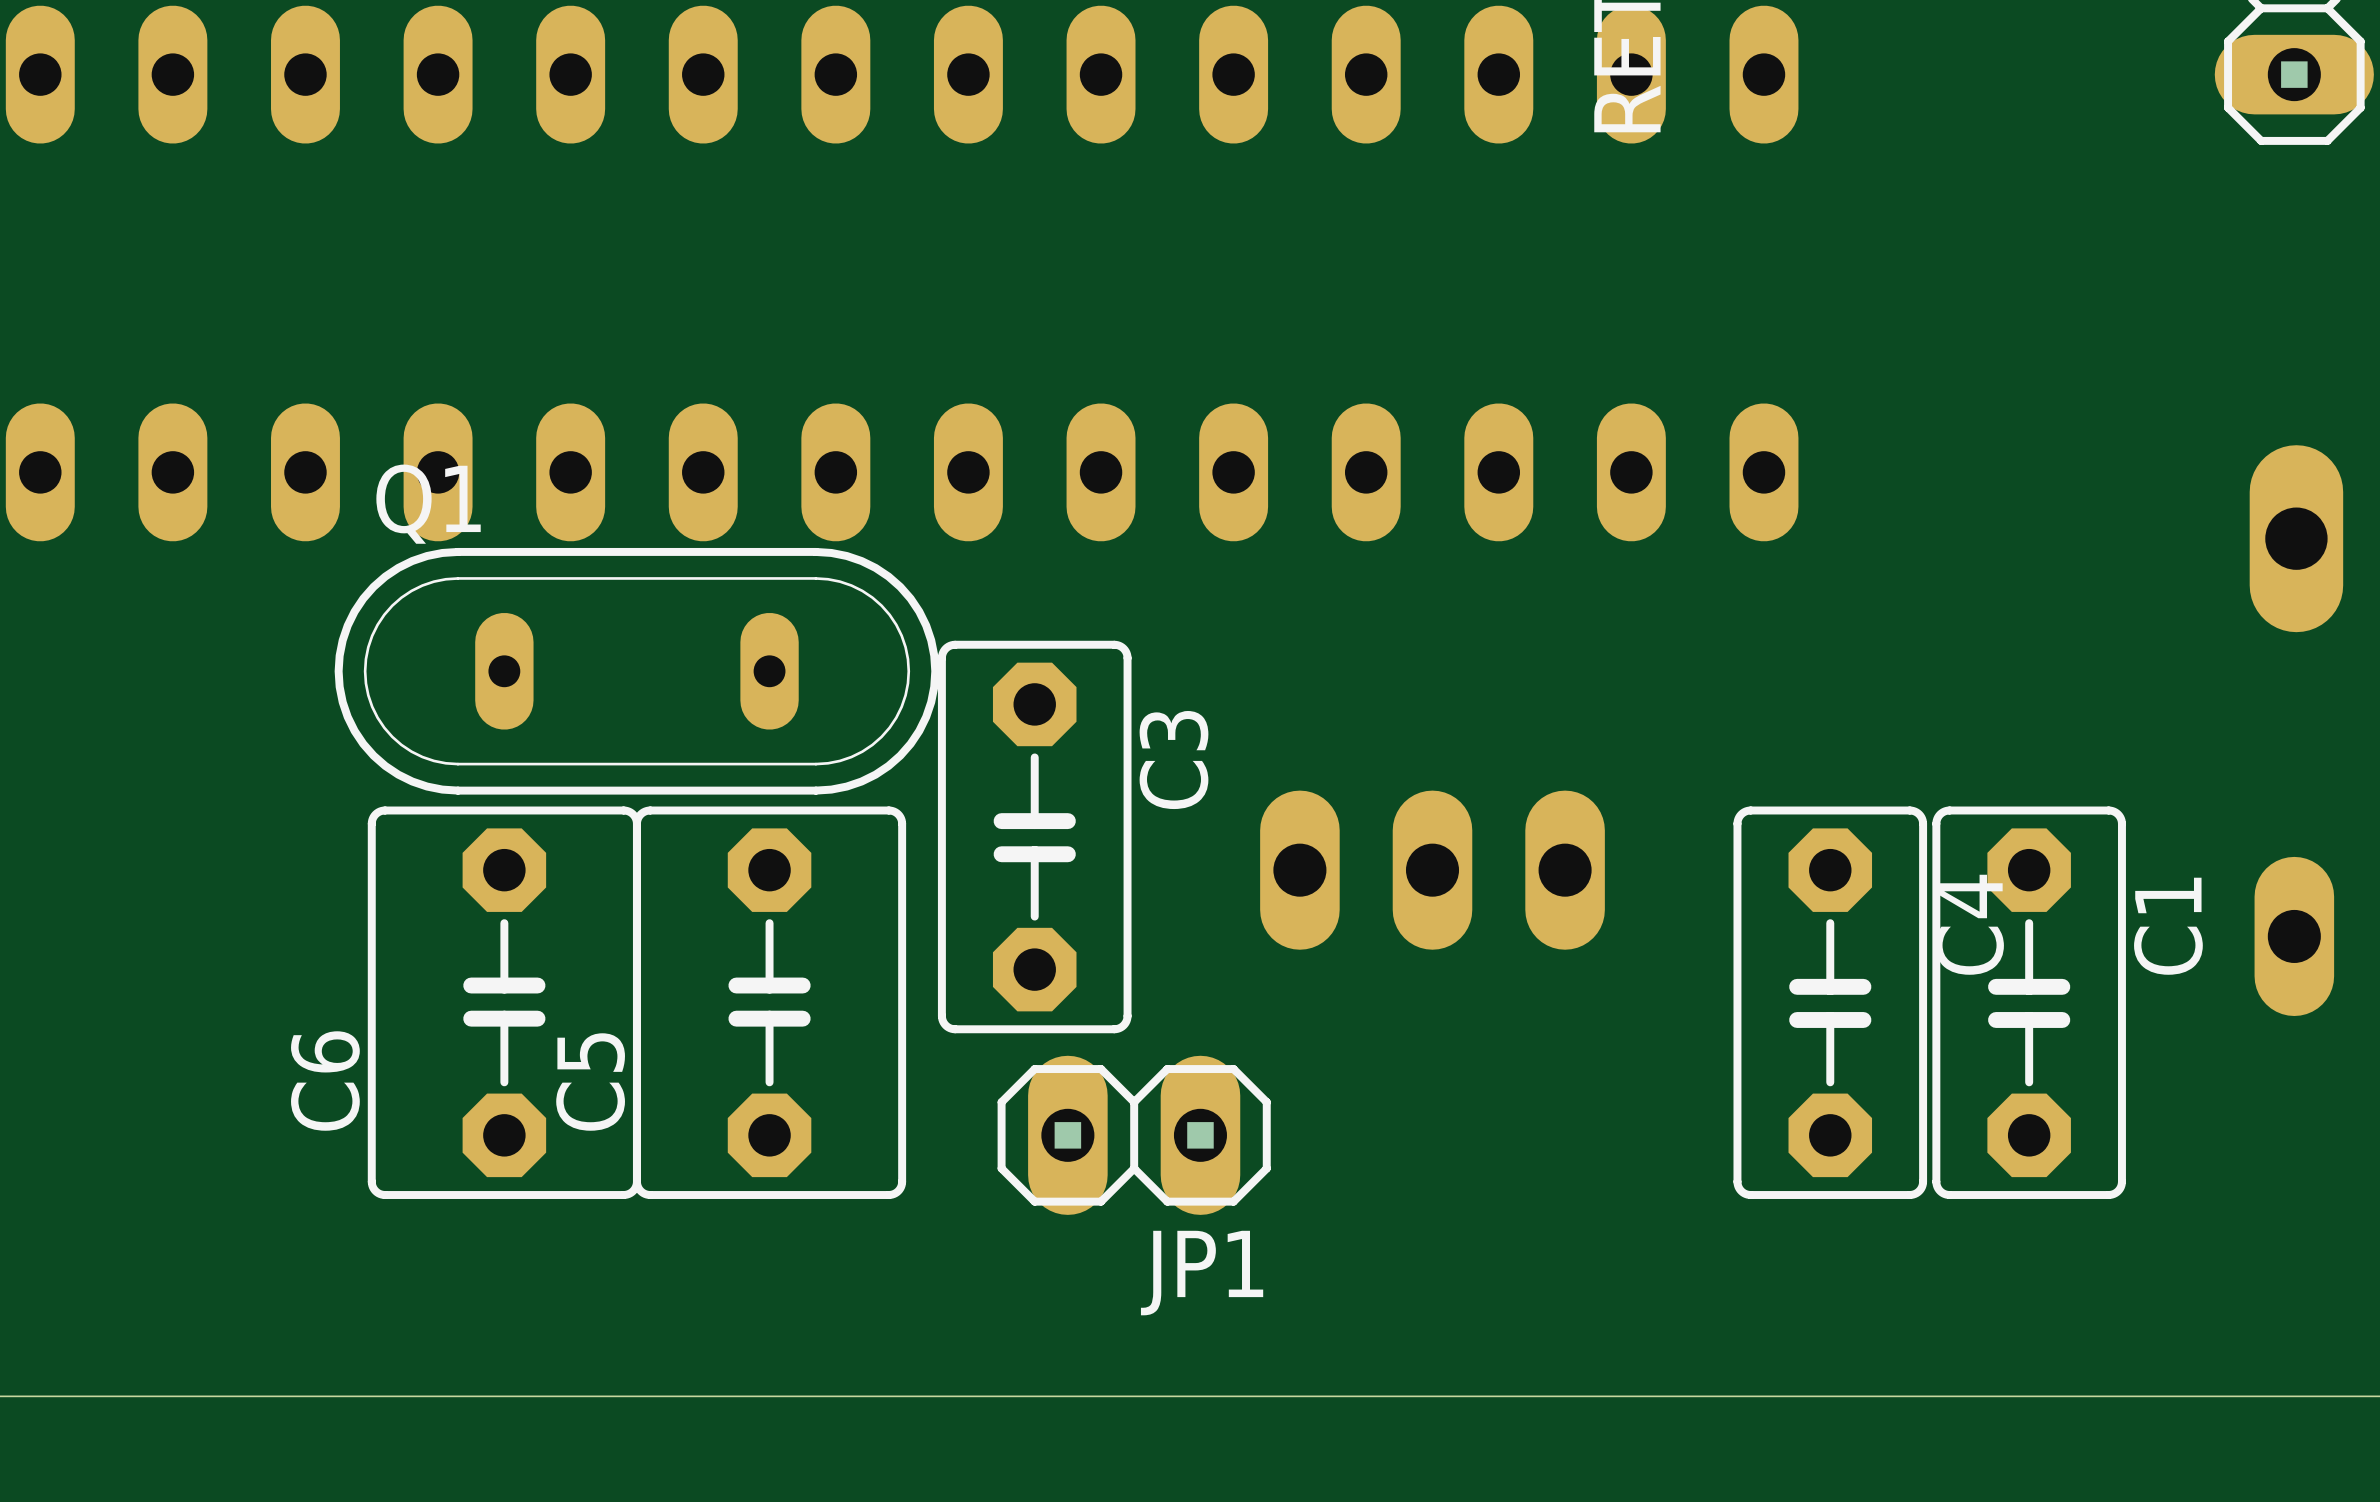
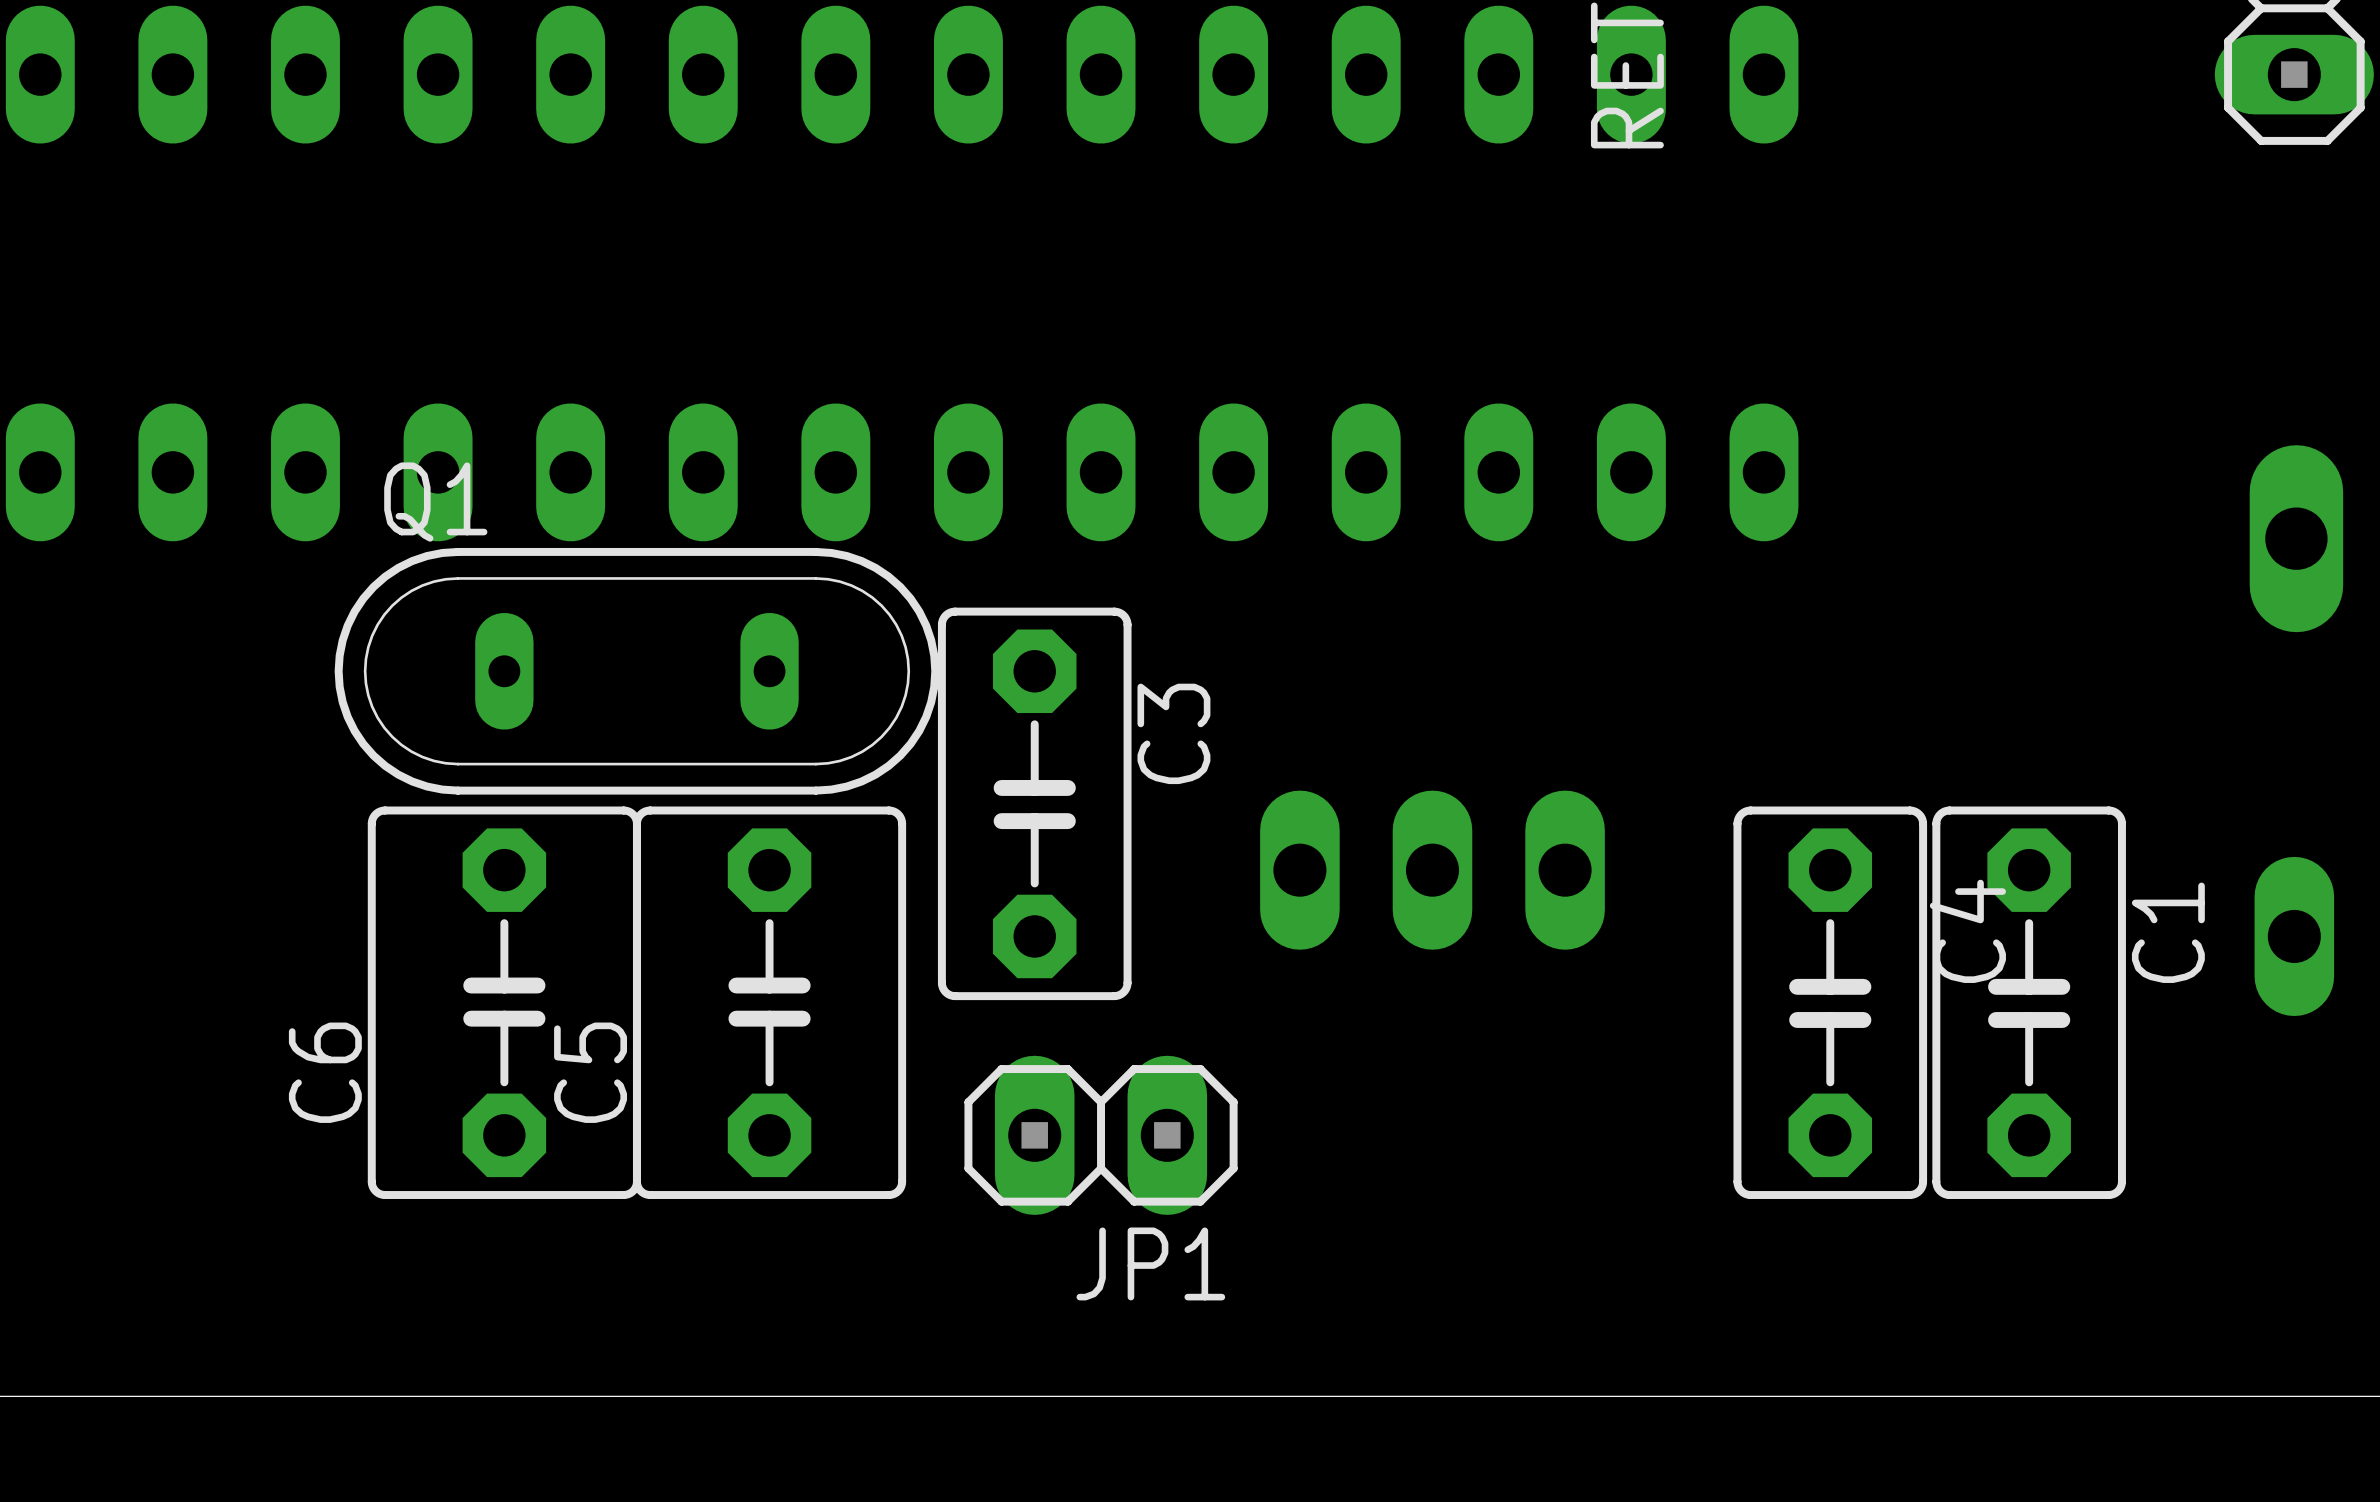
C3 position: (1034, 837) -> (1034, 803)
JP1 position: (1134, 1135) -> (1101, 1135)

